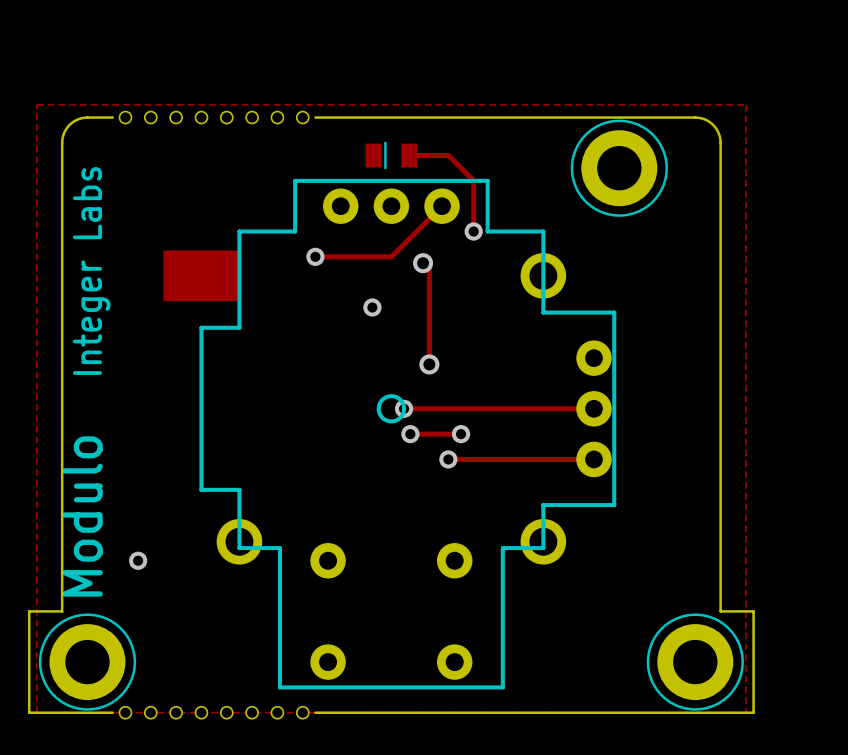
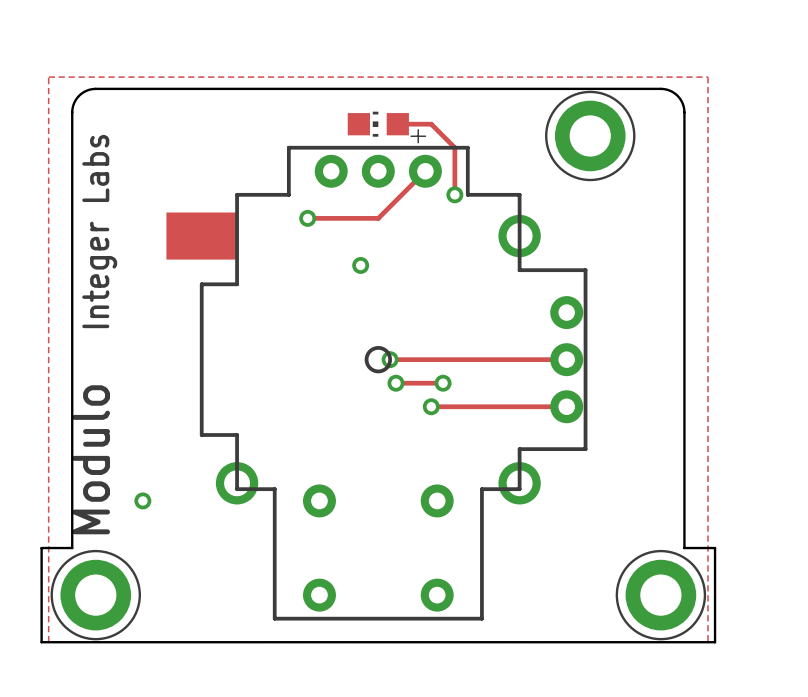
part footprint: [27, 111, 755, 719] -> [40, 87, 717, 644]
part footprint: [365, 141, 418, 170] -> [347, 111, 409, 137]
track: (423, 263) (429, 269) (429, 364) -> none
via: (423, 263) -> none
via: (429, 364) -> none

